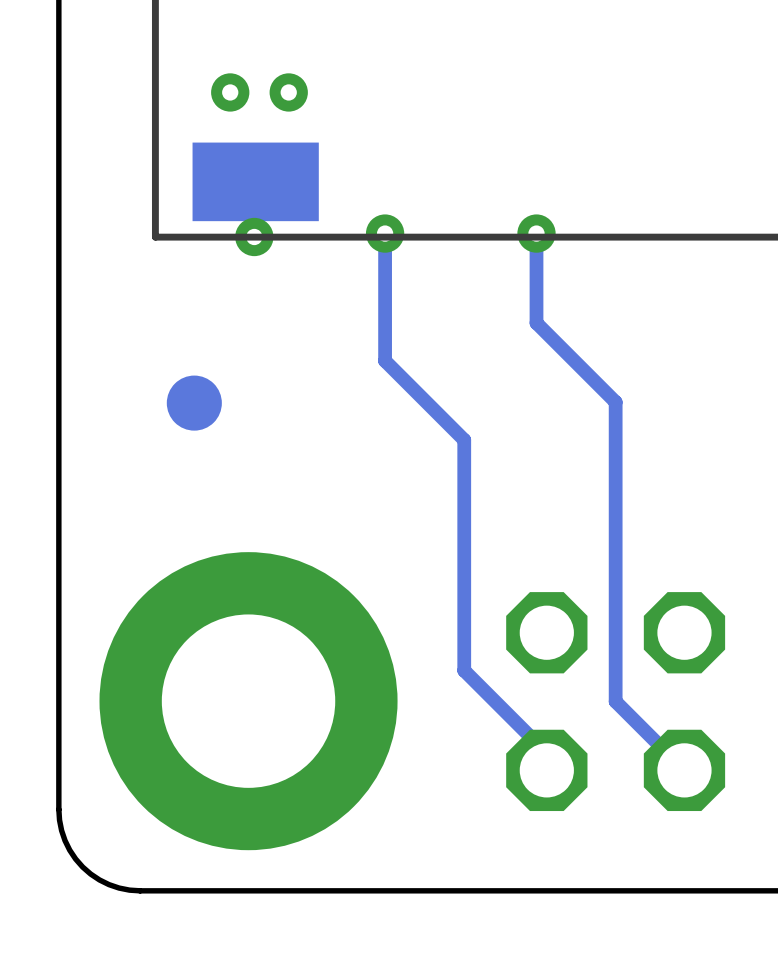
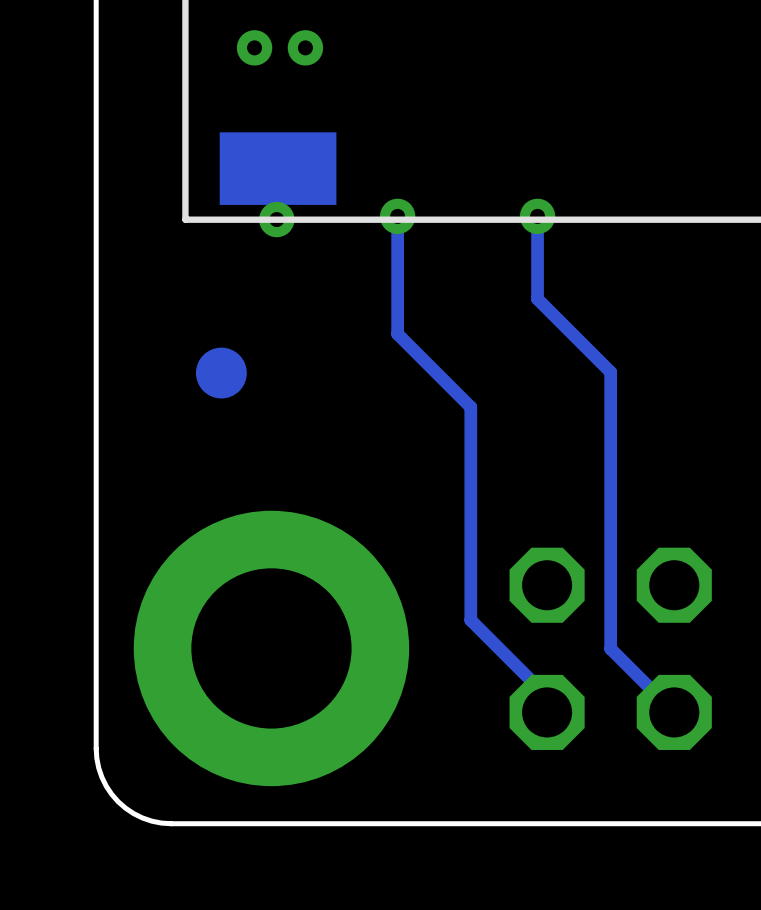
via: none -> (254, 47)
via: none -> (305, 47)
via: (230, 92) -> none
via: (288, 92) -> none

